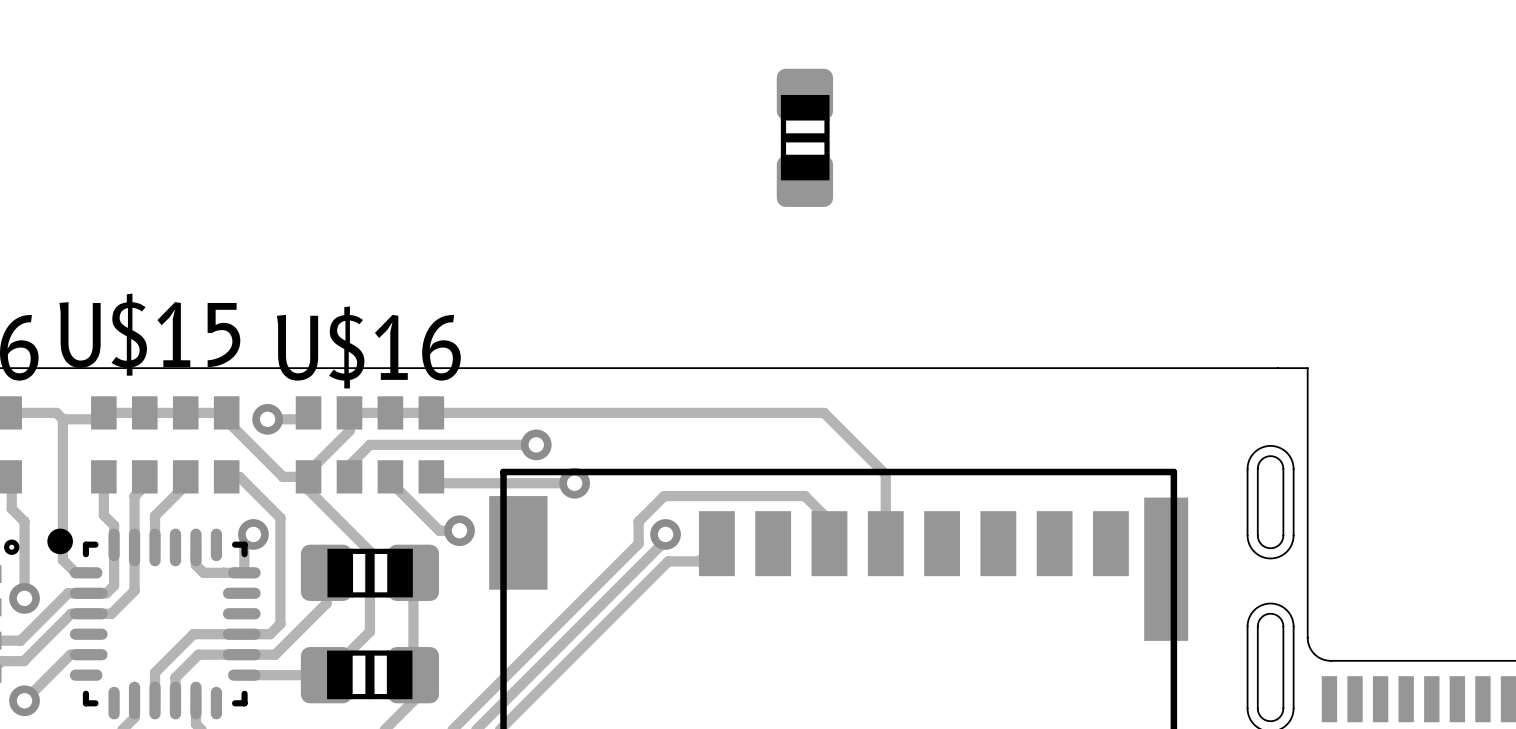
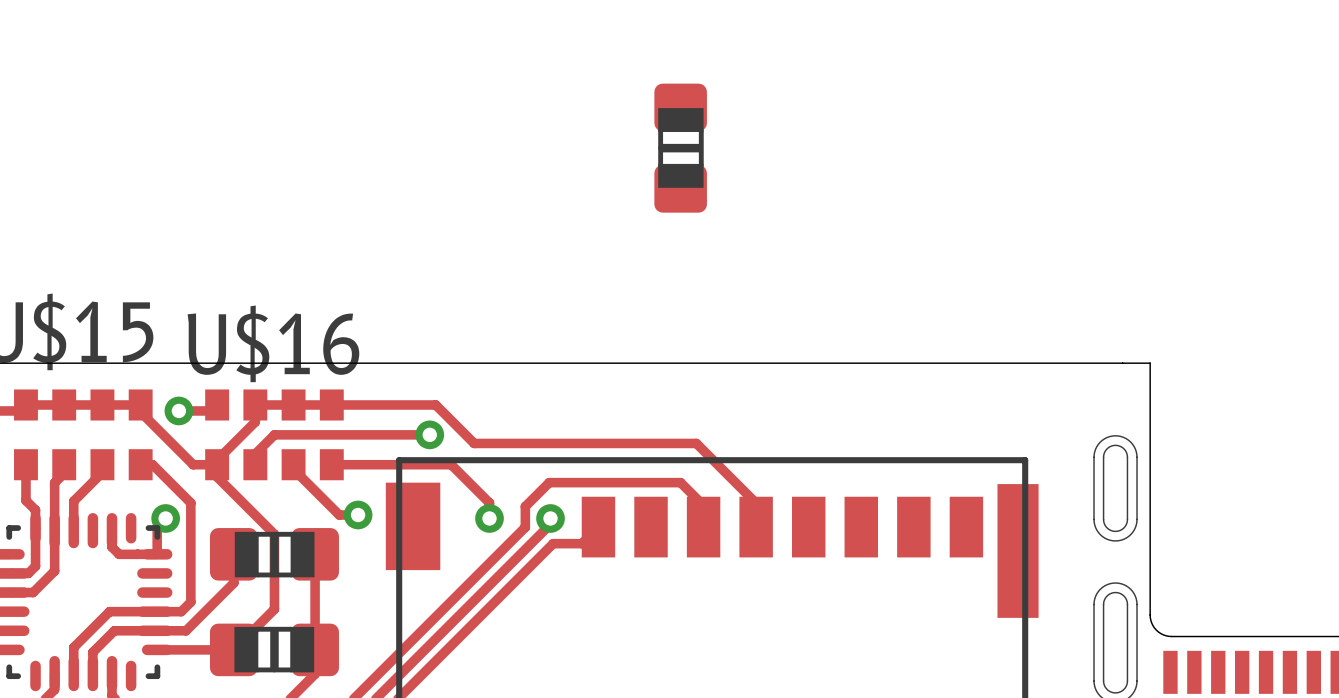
track: (542, 412) (824, 412) (885, 474) (885, 518) -> (435, 404) (474, 443) (696, 443) (756, 503)
track: (431, 476) (437, 483) (574, 483) -> (331, 464) (451, 464) (489, 502) (489, 518)
via position: (574, 483) -> (489, 518)

